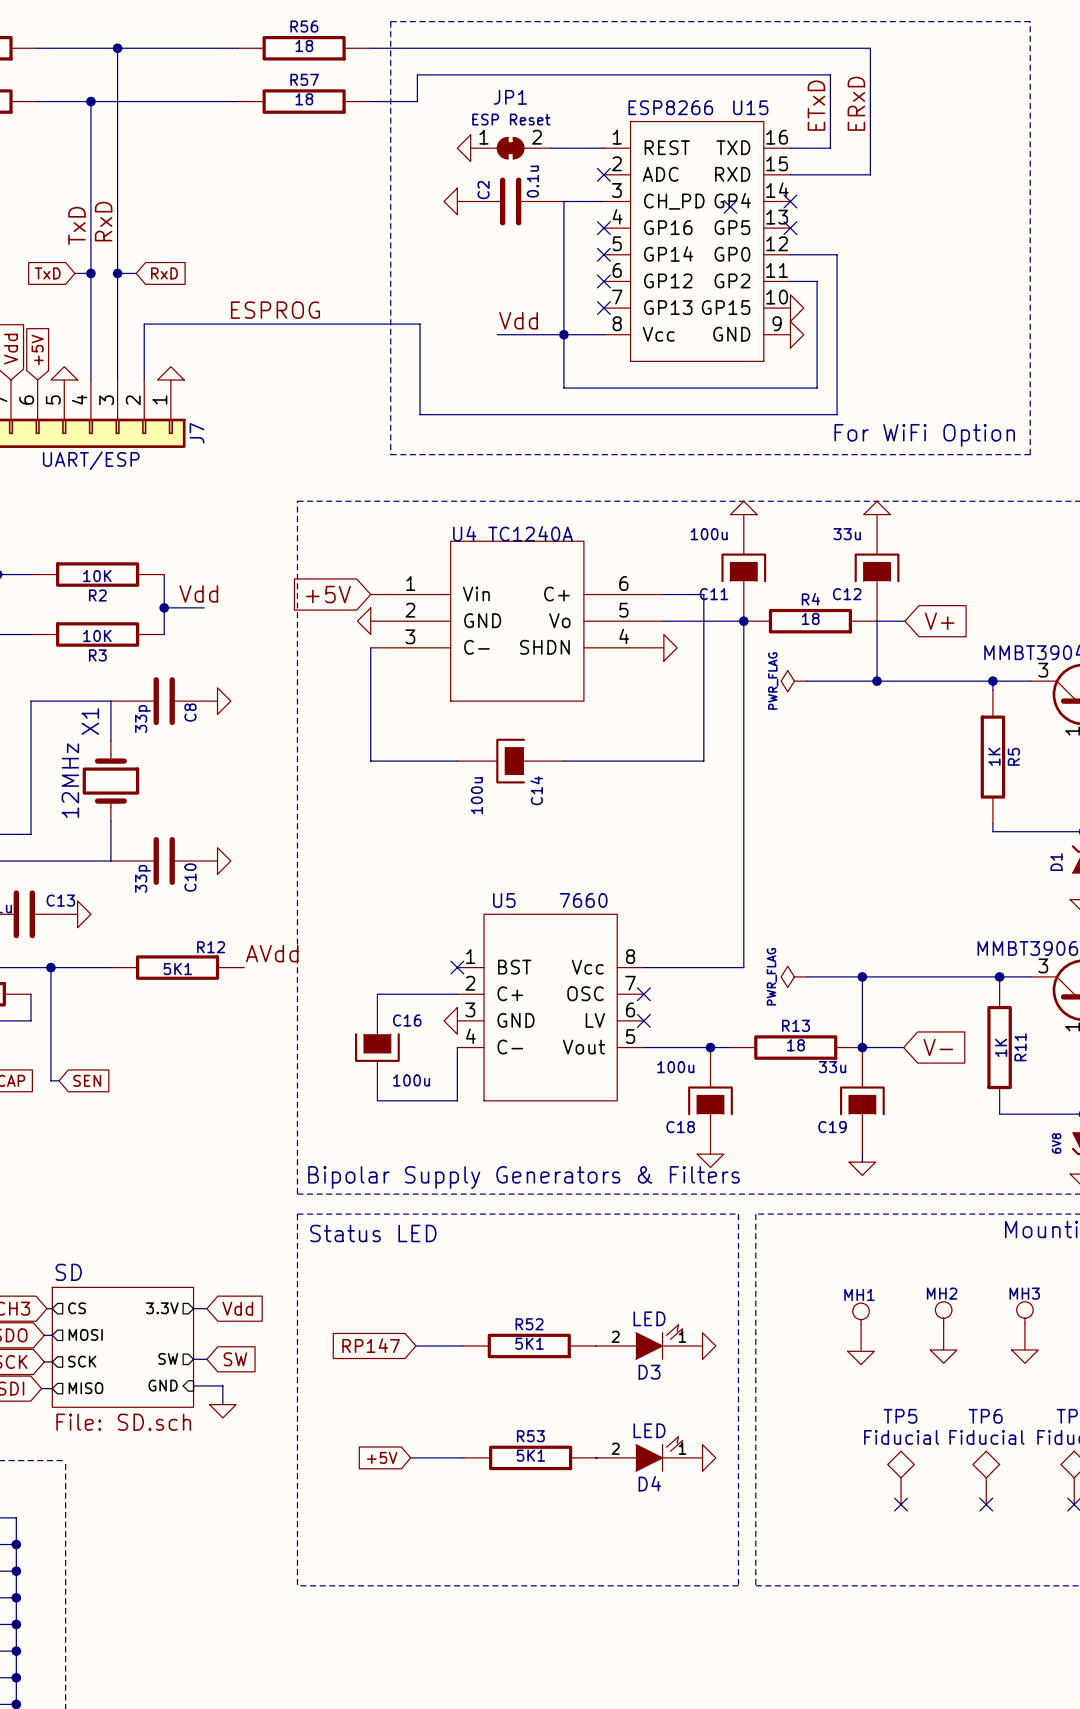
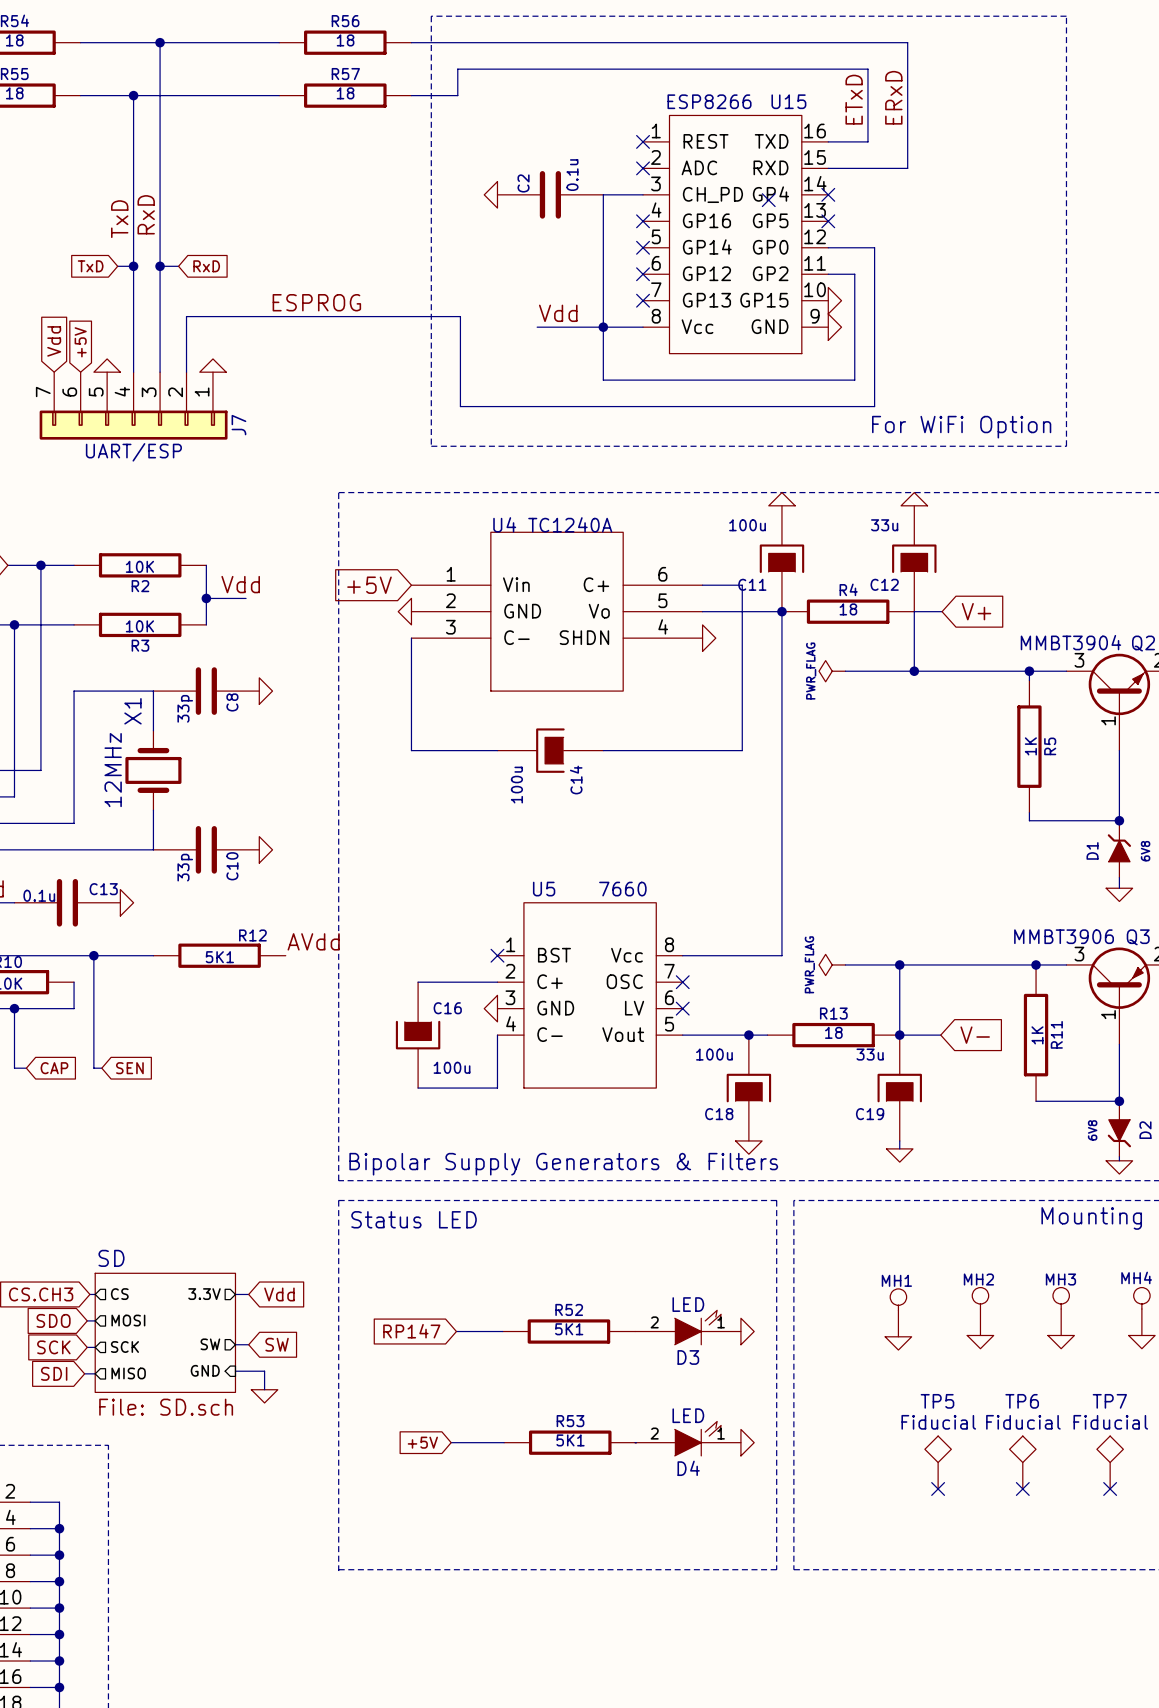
power symbol: (464, 148) -> none
JP1: ESP Reset (510, 148) -> none
wire: (550, 148) (603, 148) -> none
no-connect mark: none -> (643, 141)

